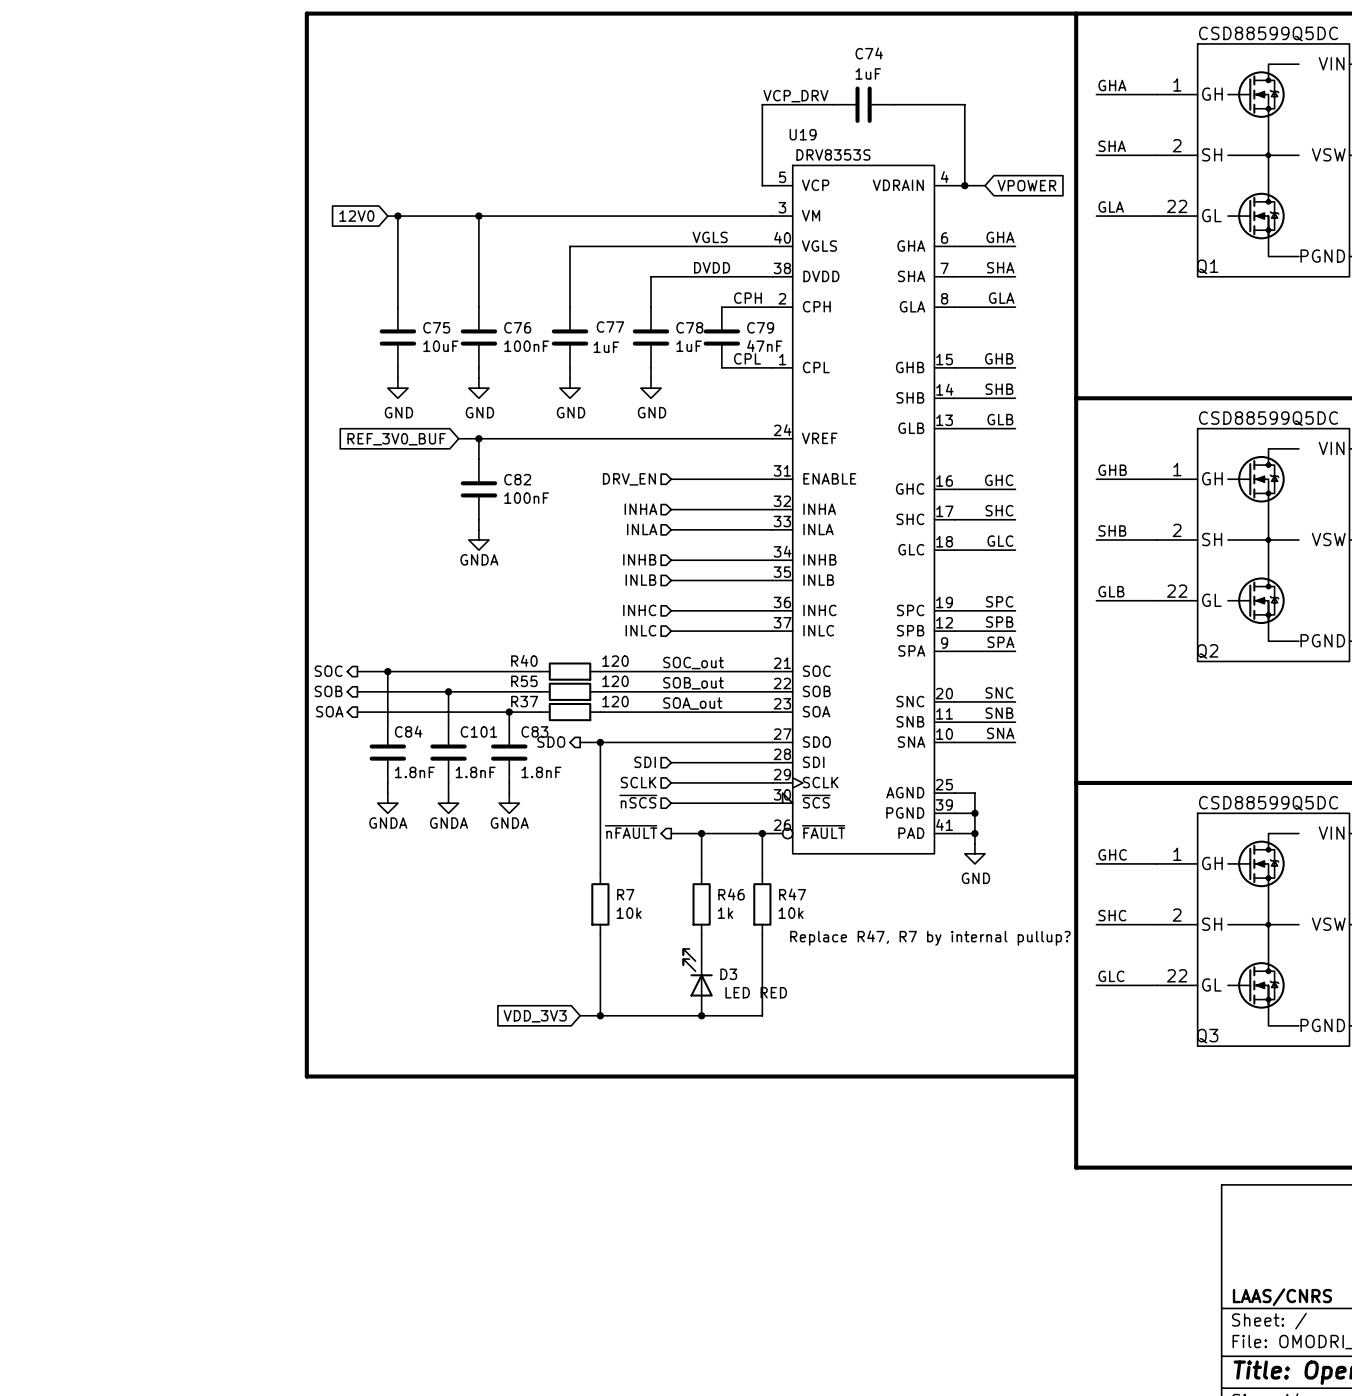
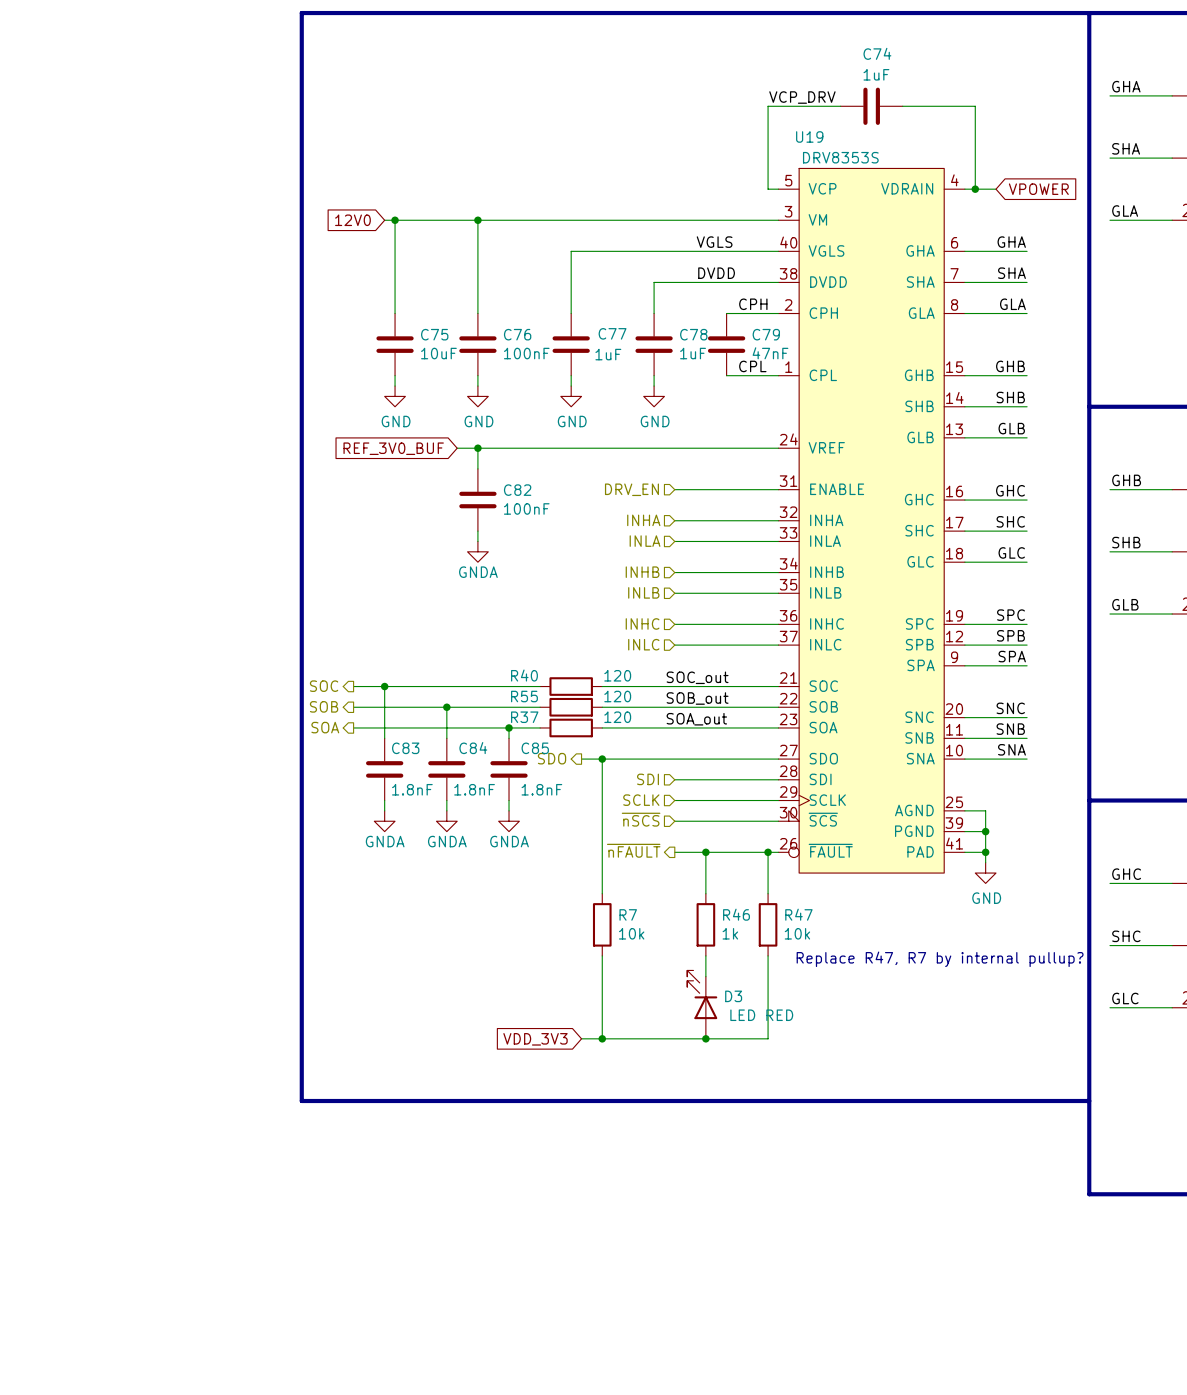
C84 name: C84 (408, 731) -> C83 (405, 748)
C101 name: C101 (478, 731) -> C84 (473, 748)
C83 name: C83 (534, 731) -> C85 (535, 748)

